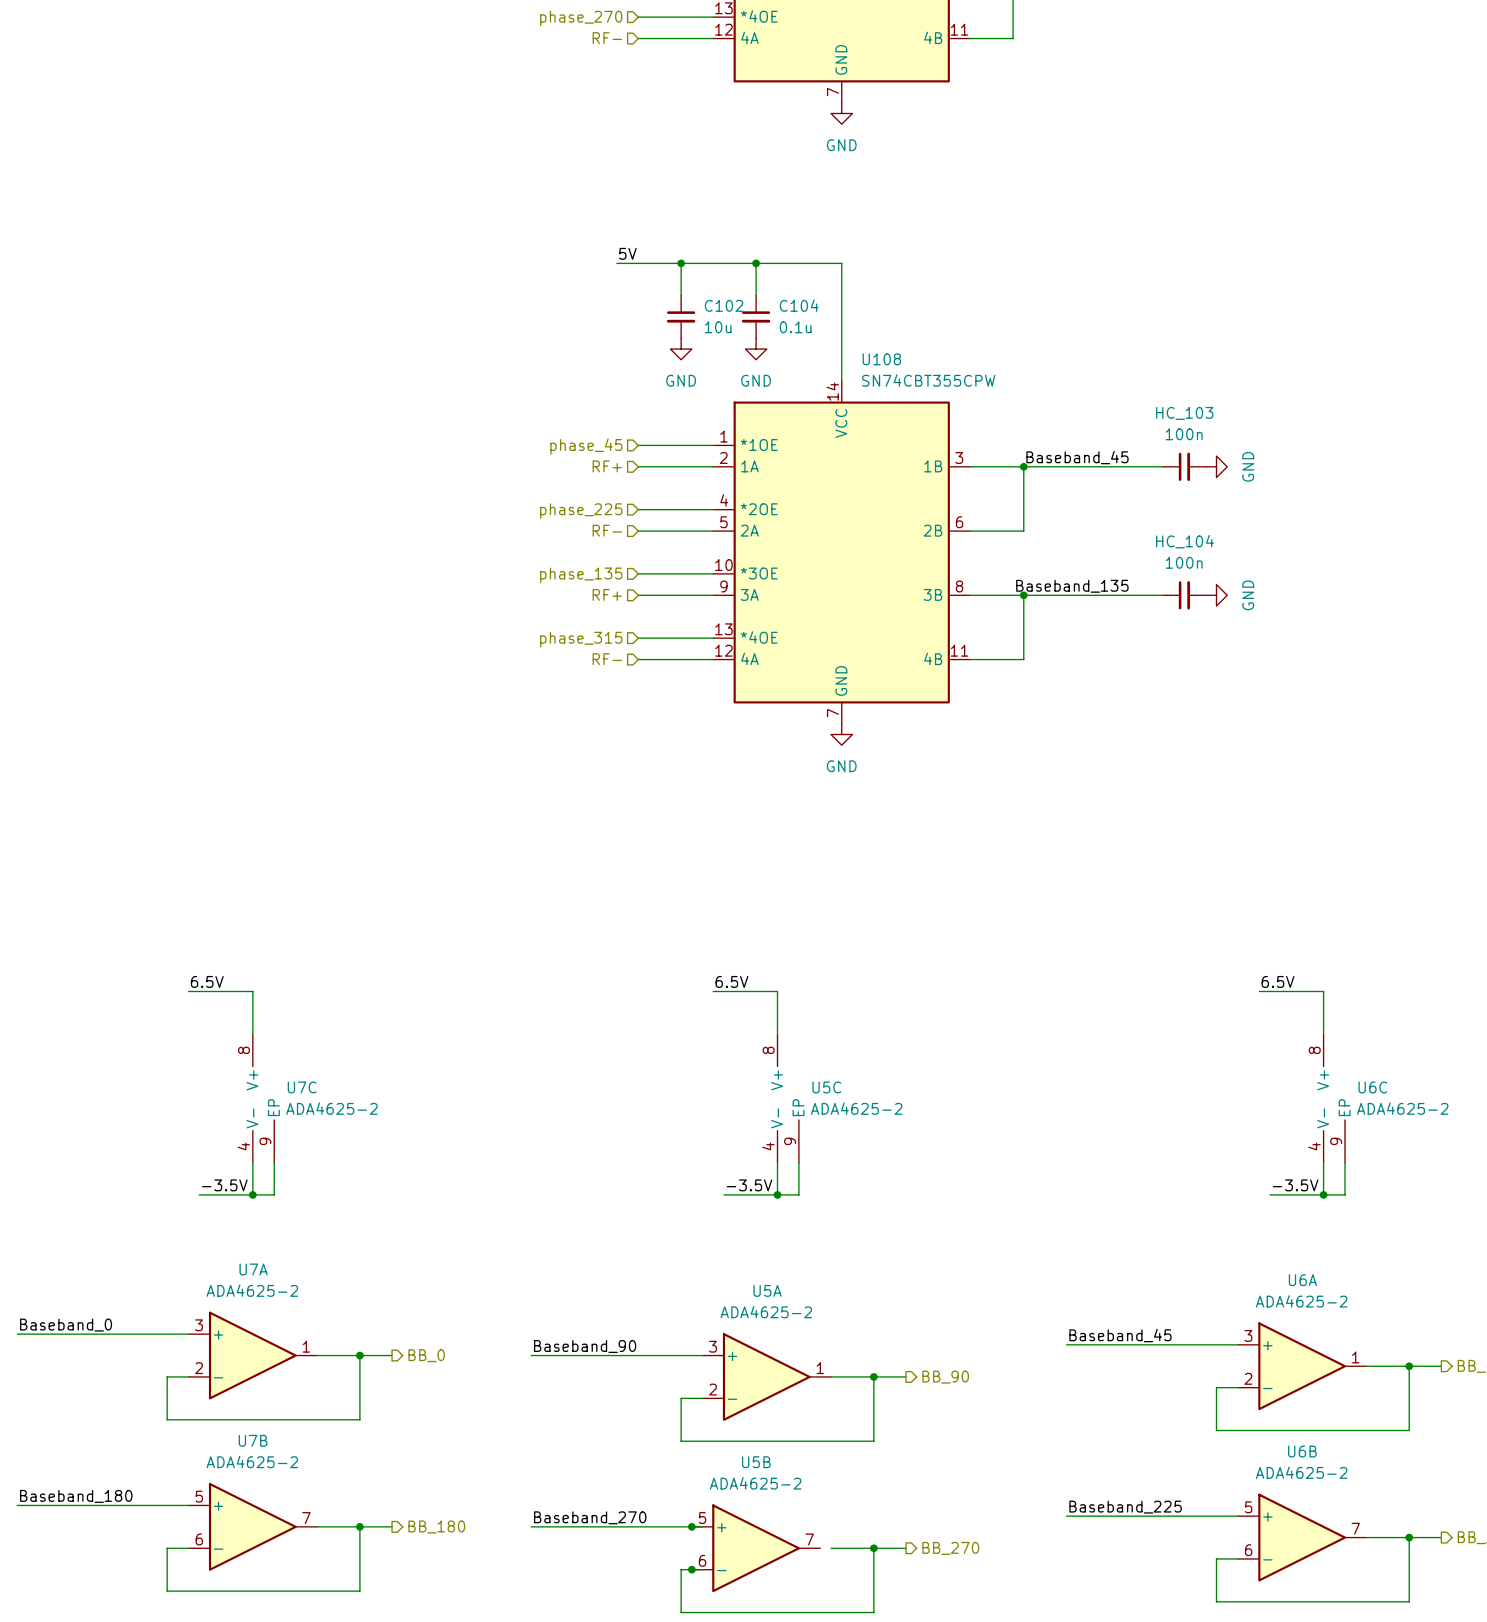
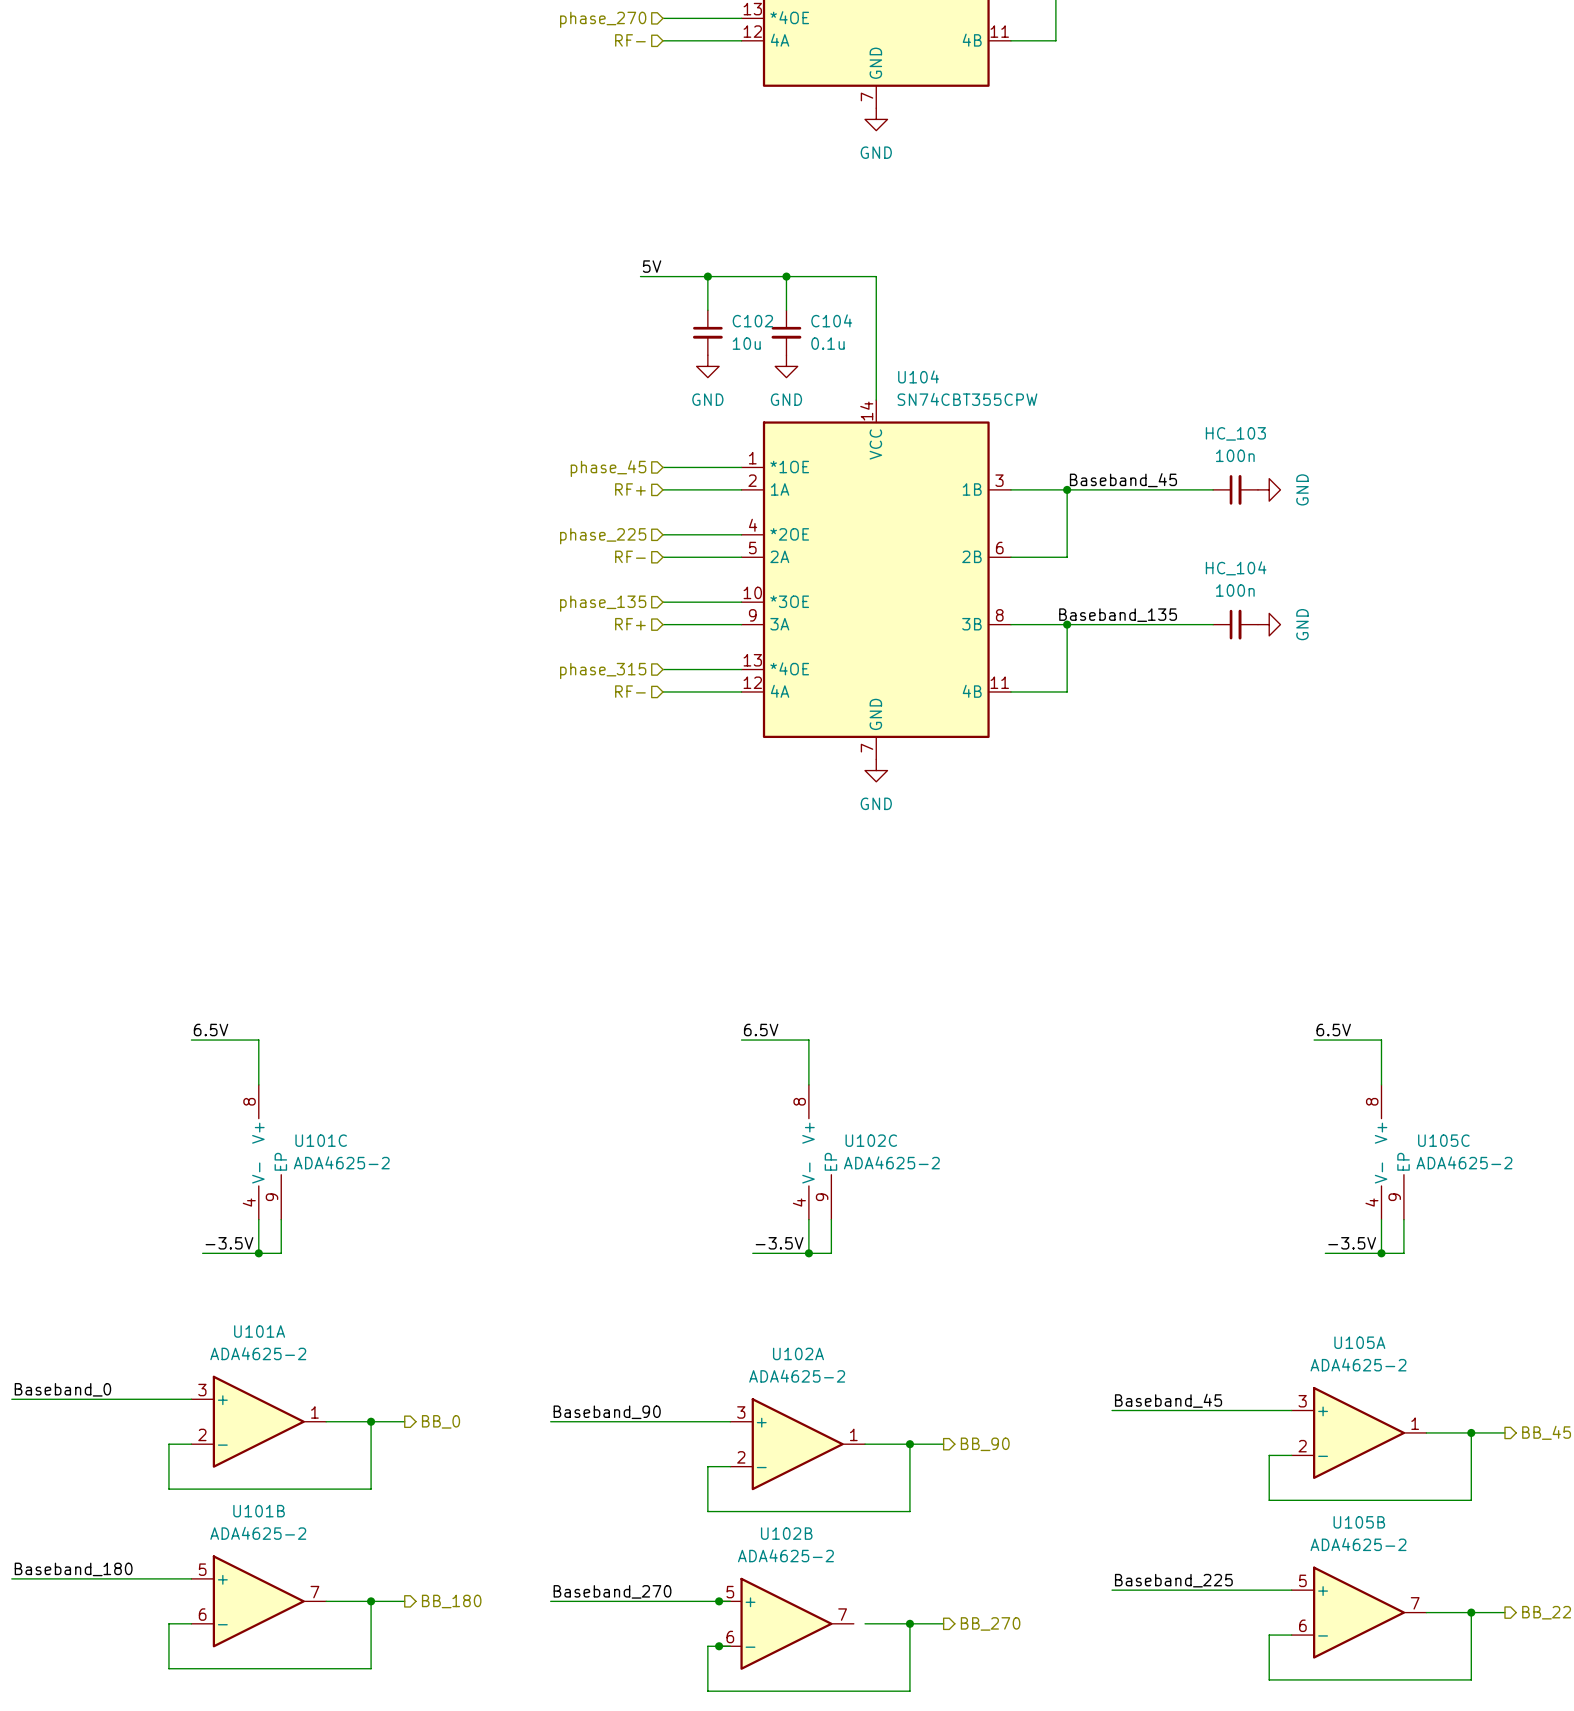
U108 name: U108 (881, 359) -> U104 (918, 376)
U7C name: U7C (302, 1087) -> U101C (321, 1140)
U5C name: U5C (826, 1087) -> U102C (871, 1140)
U6C name: U6C (1372, 1087) -> U105C (1443, 1140)
U7A name: U7A (253, 1269) -> U101A (259, 1331)
U6A name: U6A (1302, 1280) -> U105A (1359, 1342)
U5A name: U5A (767, 1290) -> U102A (798, 1353)
U7B name: U7B (253, 1440) -> U101B (259, 1511)
U6B name: U6B (1302, 1451) -> U105B (1359, 1522)
U5B name: U5B (756, 1462) -> U102B (786, 1533)

